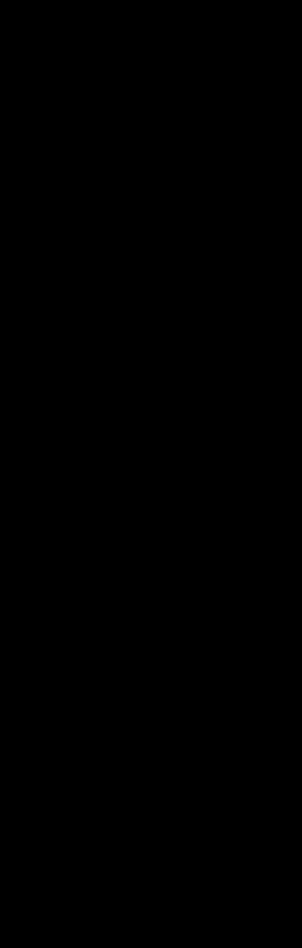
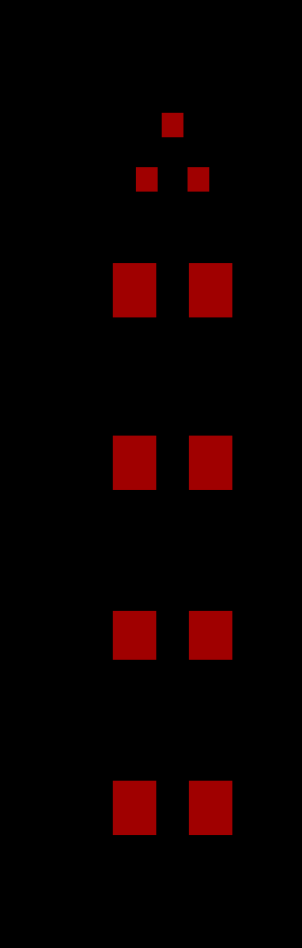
part: none -> (172, 152)
part: none -> (172, 290)
part: none -> (172, 462)
part: none -> (172, 635)
part: none -> (172, 807)

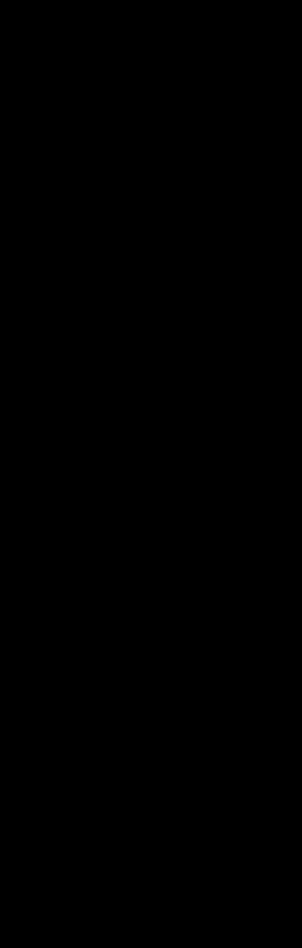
part: (172, 152) -> none
part: (172, 290) -> none
part: (172, 462) -> none
part: (172, 635) -> none
part: (172, 807) -> none

